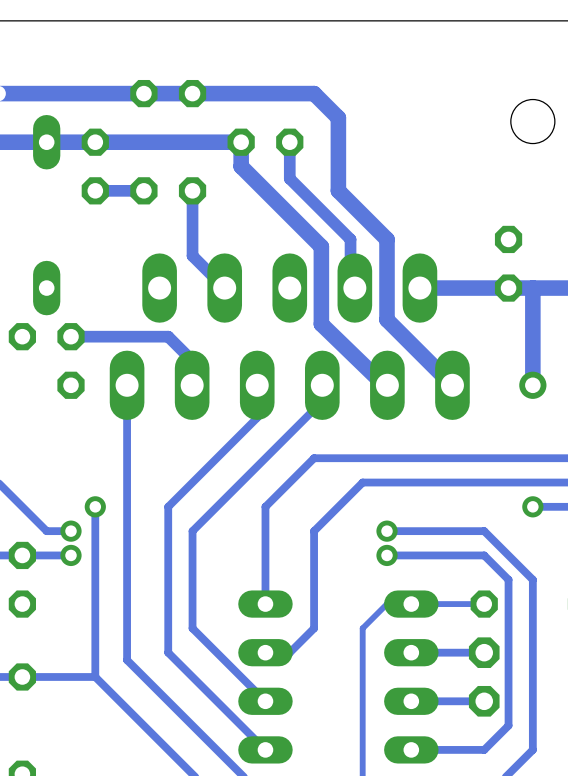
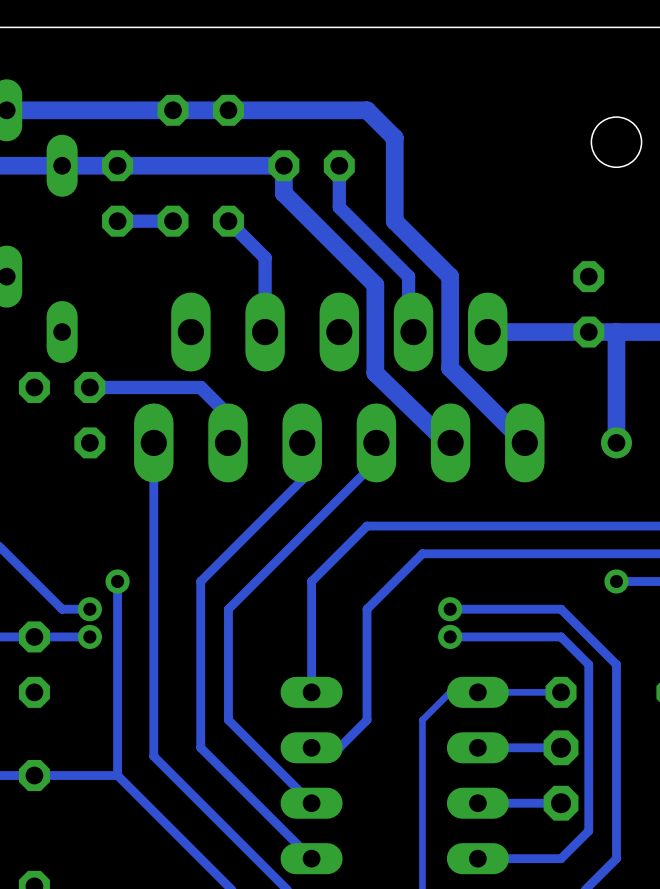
track: (192, 190) (192, 255) (224, 288) -> (228, 221) (265, 257) (265, 332)

